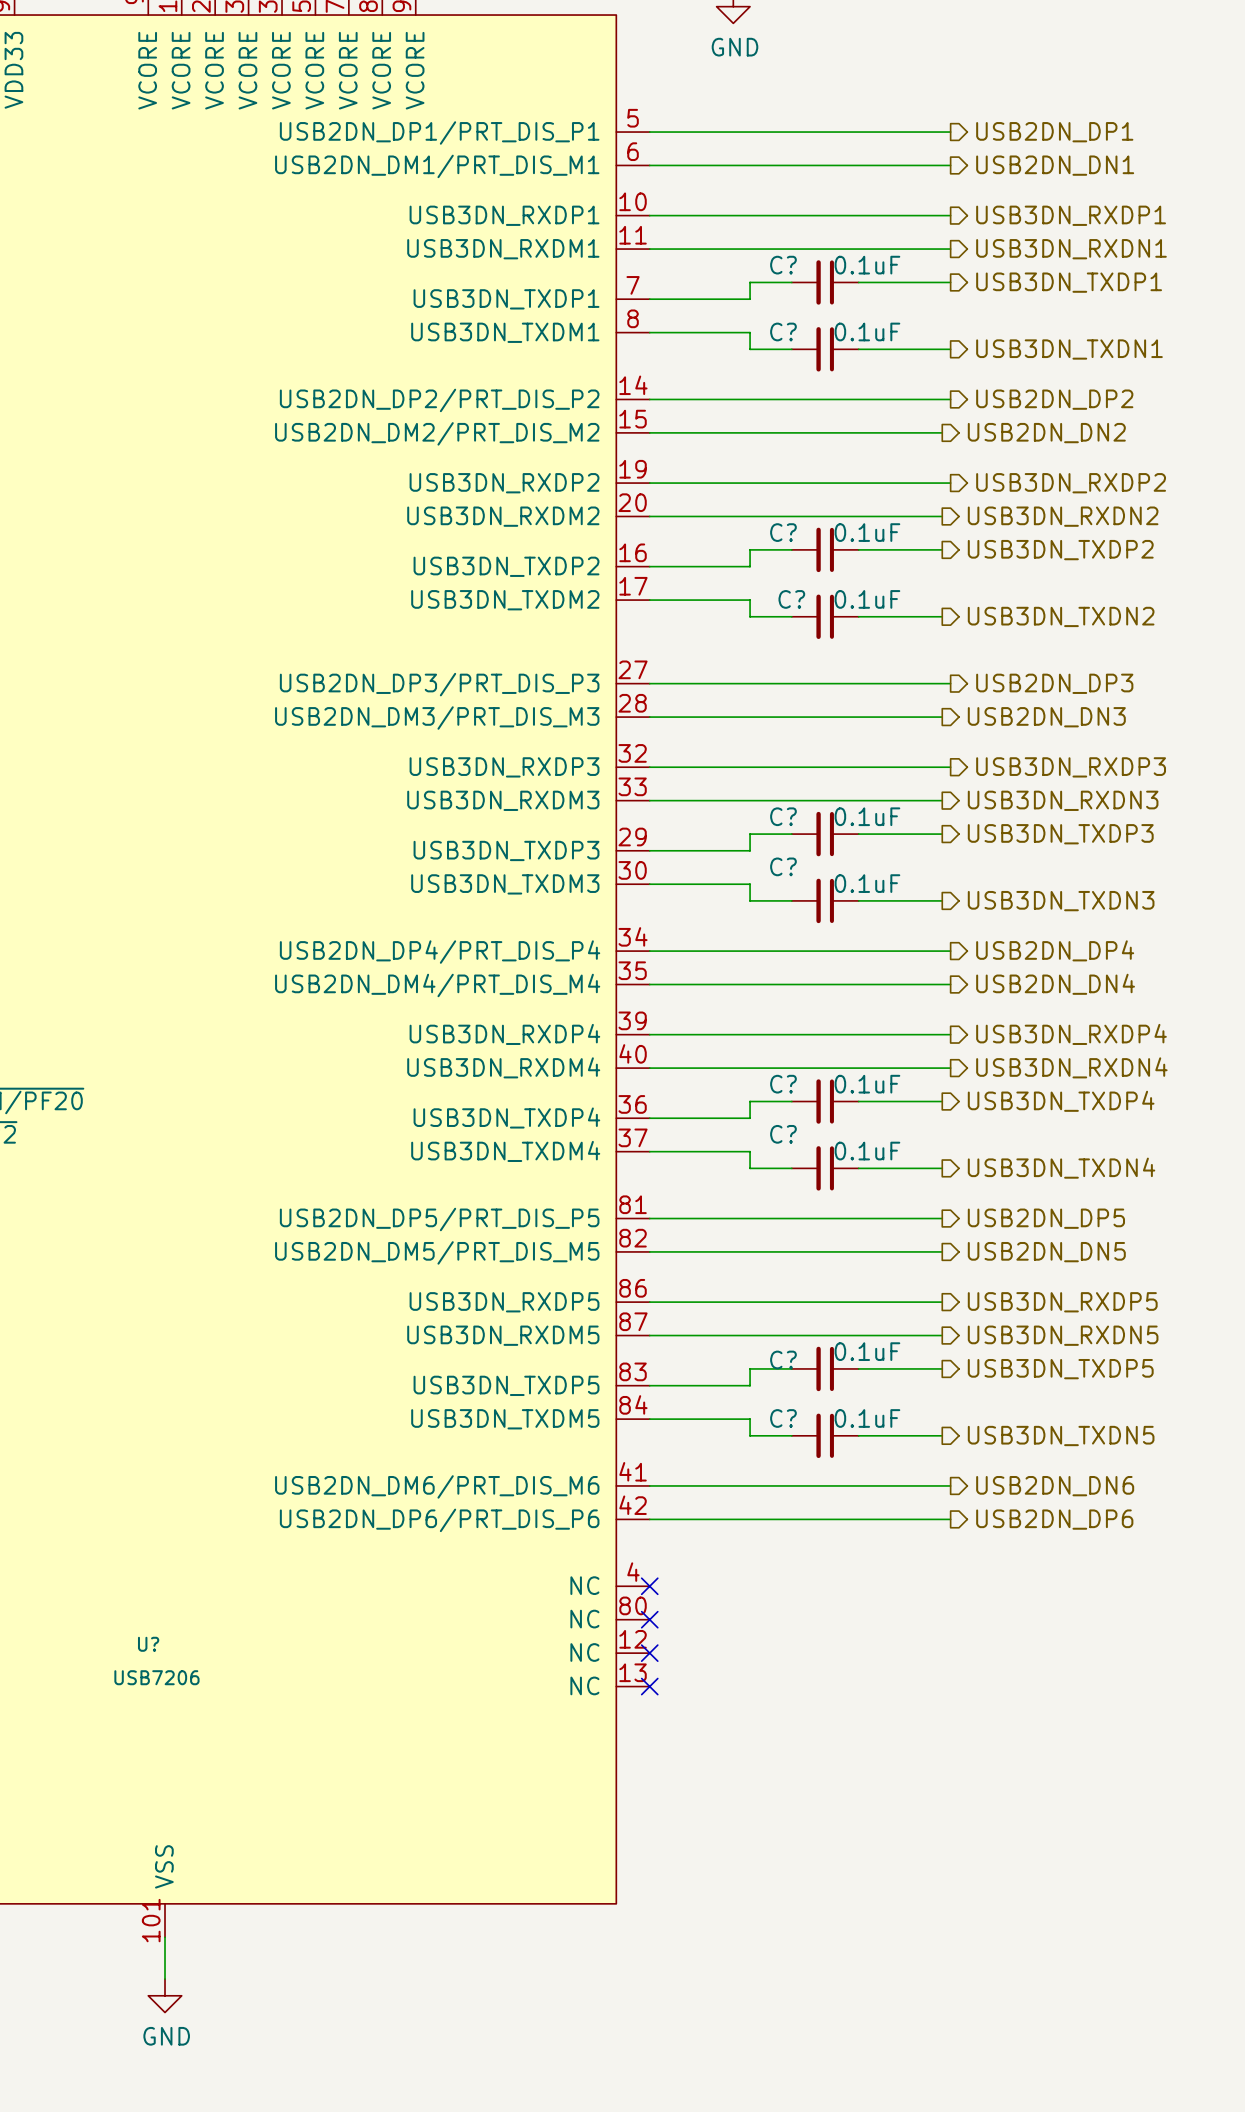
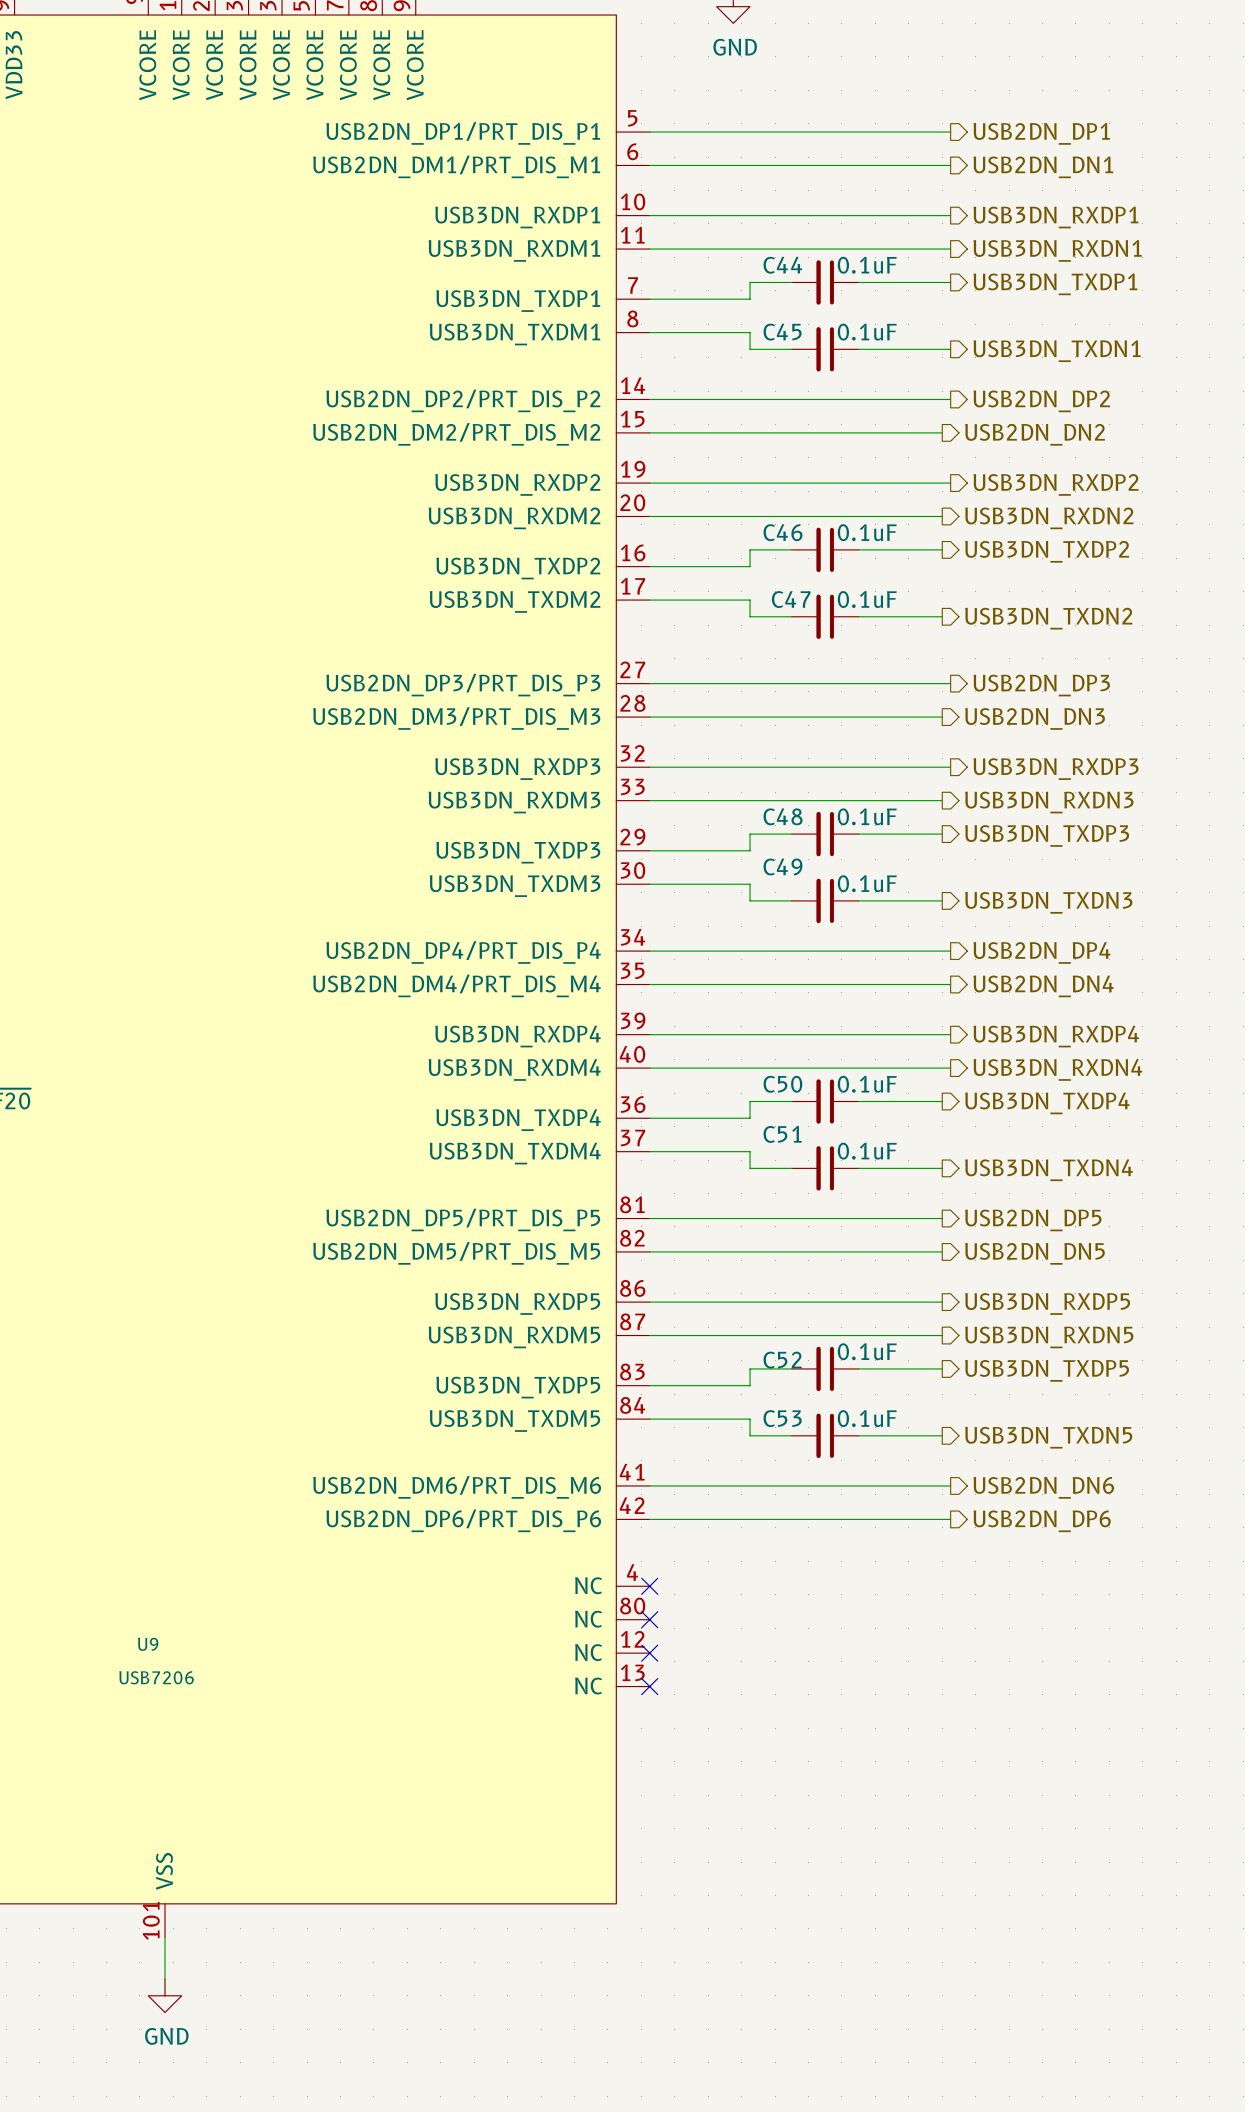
C? name: C? (783, 265) -> C44 (782, 265)
C? name: C? (783, 331) -> C45 (782, 332)
C? name: C? (783, 532) -> C46 (783, 532)
C? name: C? (791, 599) -> C47 (791, 599)
C? name: C? (783, 816) -> C48 (783, 816)
C? name: C? (783, 866) -> C49 (782, 866)
C? name: C? (783, 1084) -> C50 (782, 1084)
C? name: C? (783, 1134) -> C51 (782, 1134)
C? name: C? (783, 1359) -> C52 (782, 1360)
C? name: C? (783, 1418) -> C53 (782, 1418)
U? name: U? (148, 1644) -> U9 (148, 1644)

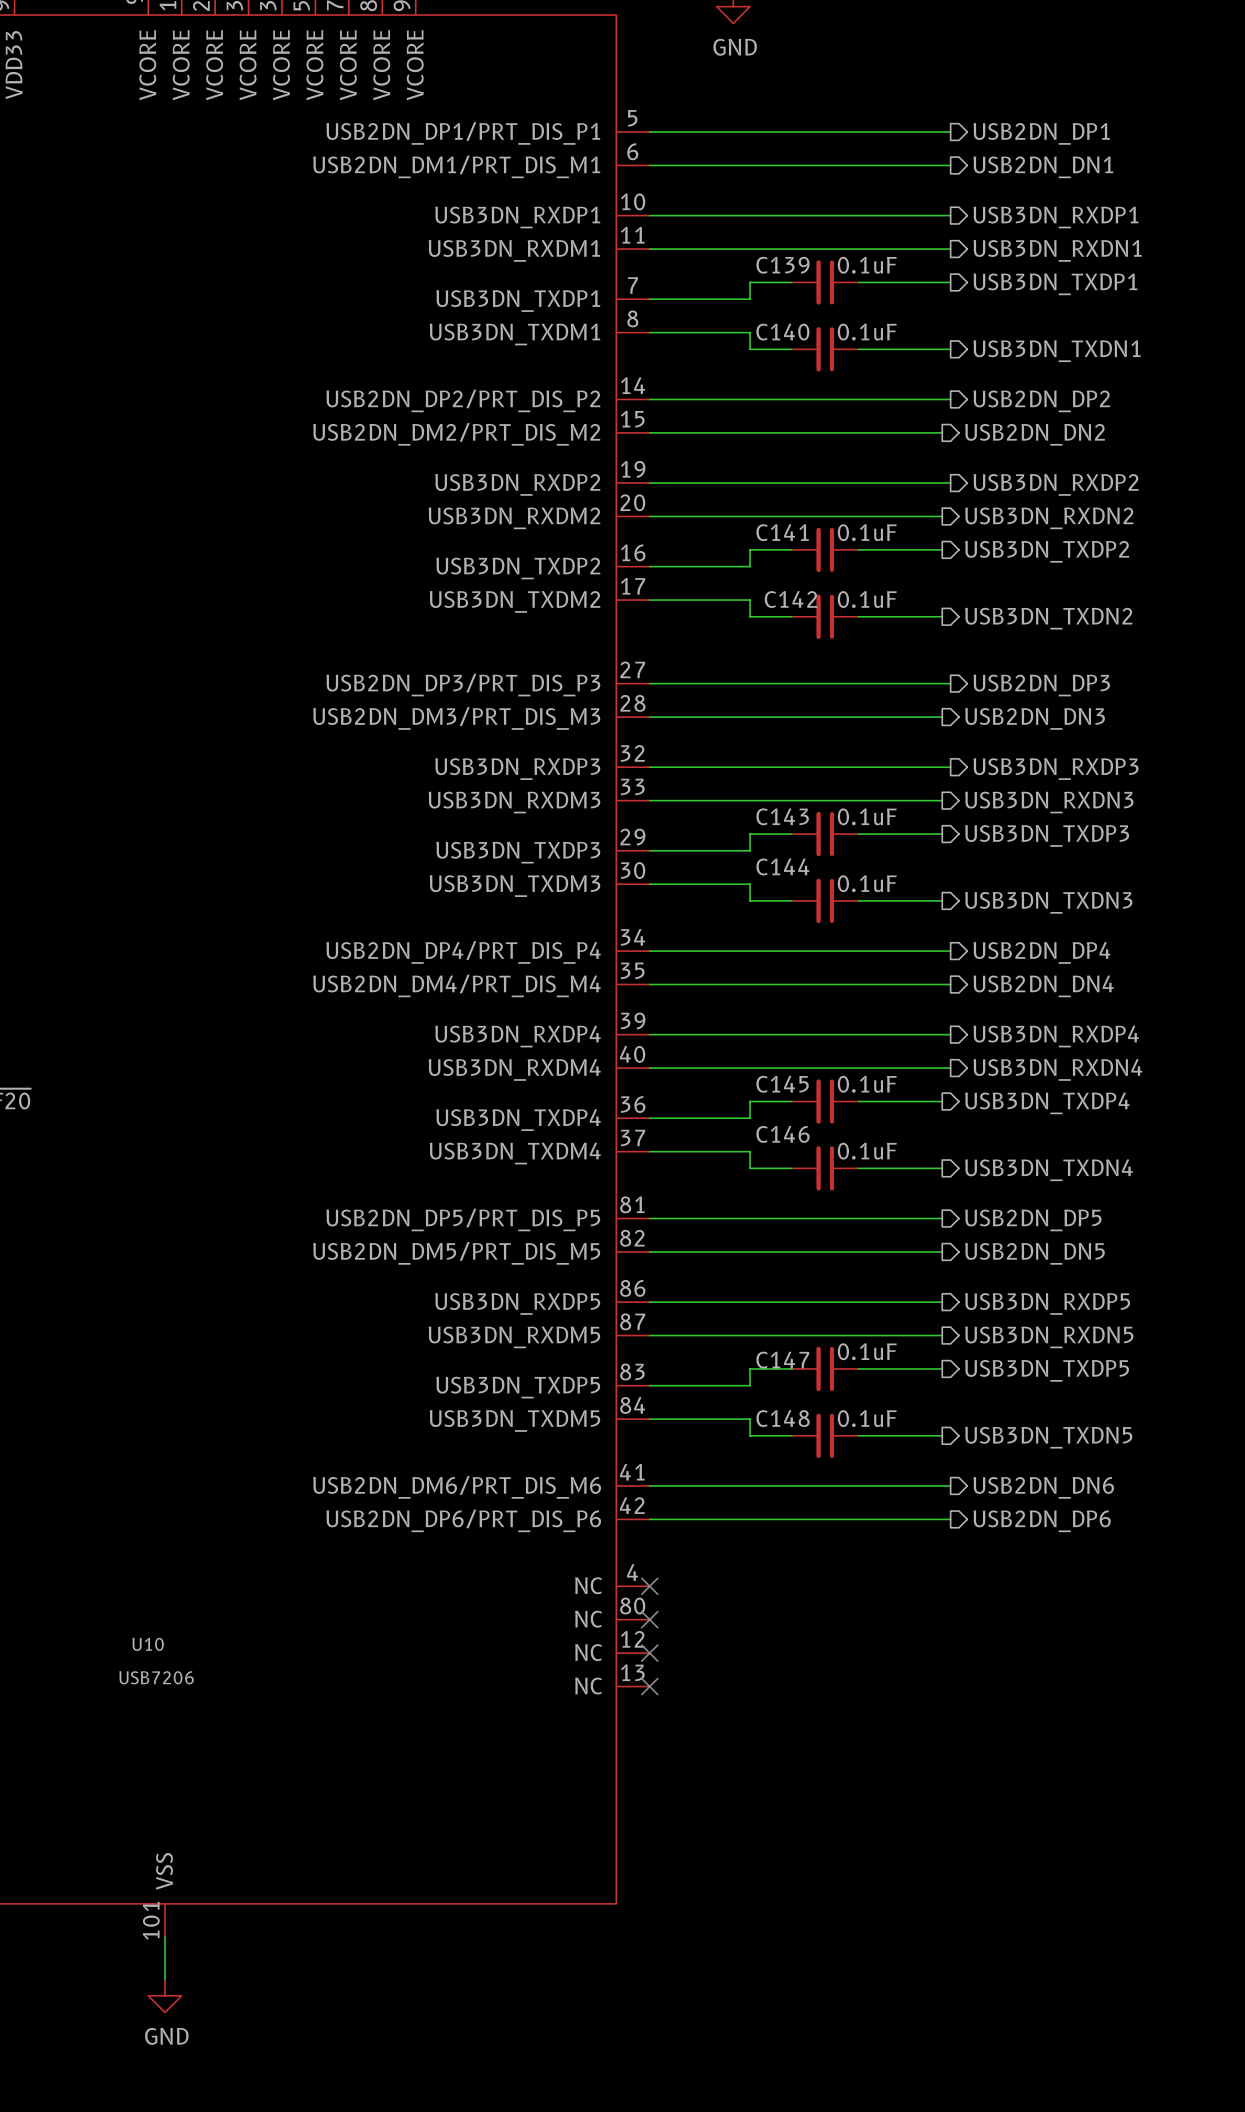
C44 name: C44 (782, 265) -> C139 (782, 265)
C45 name: C45 (782, 332) -> C140 (782, 332)
C46 name: C46 (783, 532) -> C141 (782, 532)
C47 name: C47 (791, 599) -> C142 (790, 599)
C48 name: C48 (783, 816) -> C143 (782, 816)
C49 name: C49 (782, 866) -> C144 (782, 866)
C50 name: C50 (782, 1084) -> C145 (782, 1084)
C51 name: C51 (782, 1134) -> C146 (783, 1134)
C52 name: C52 (782, 1360) -> C147 (782, 1360)
C53 name: C53 (782, 1418) -> C148 (783, 1418)
U9 name: U9 (148, 1644) -> U10 (148, 1644)

